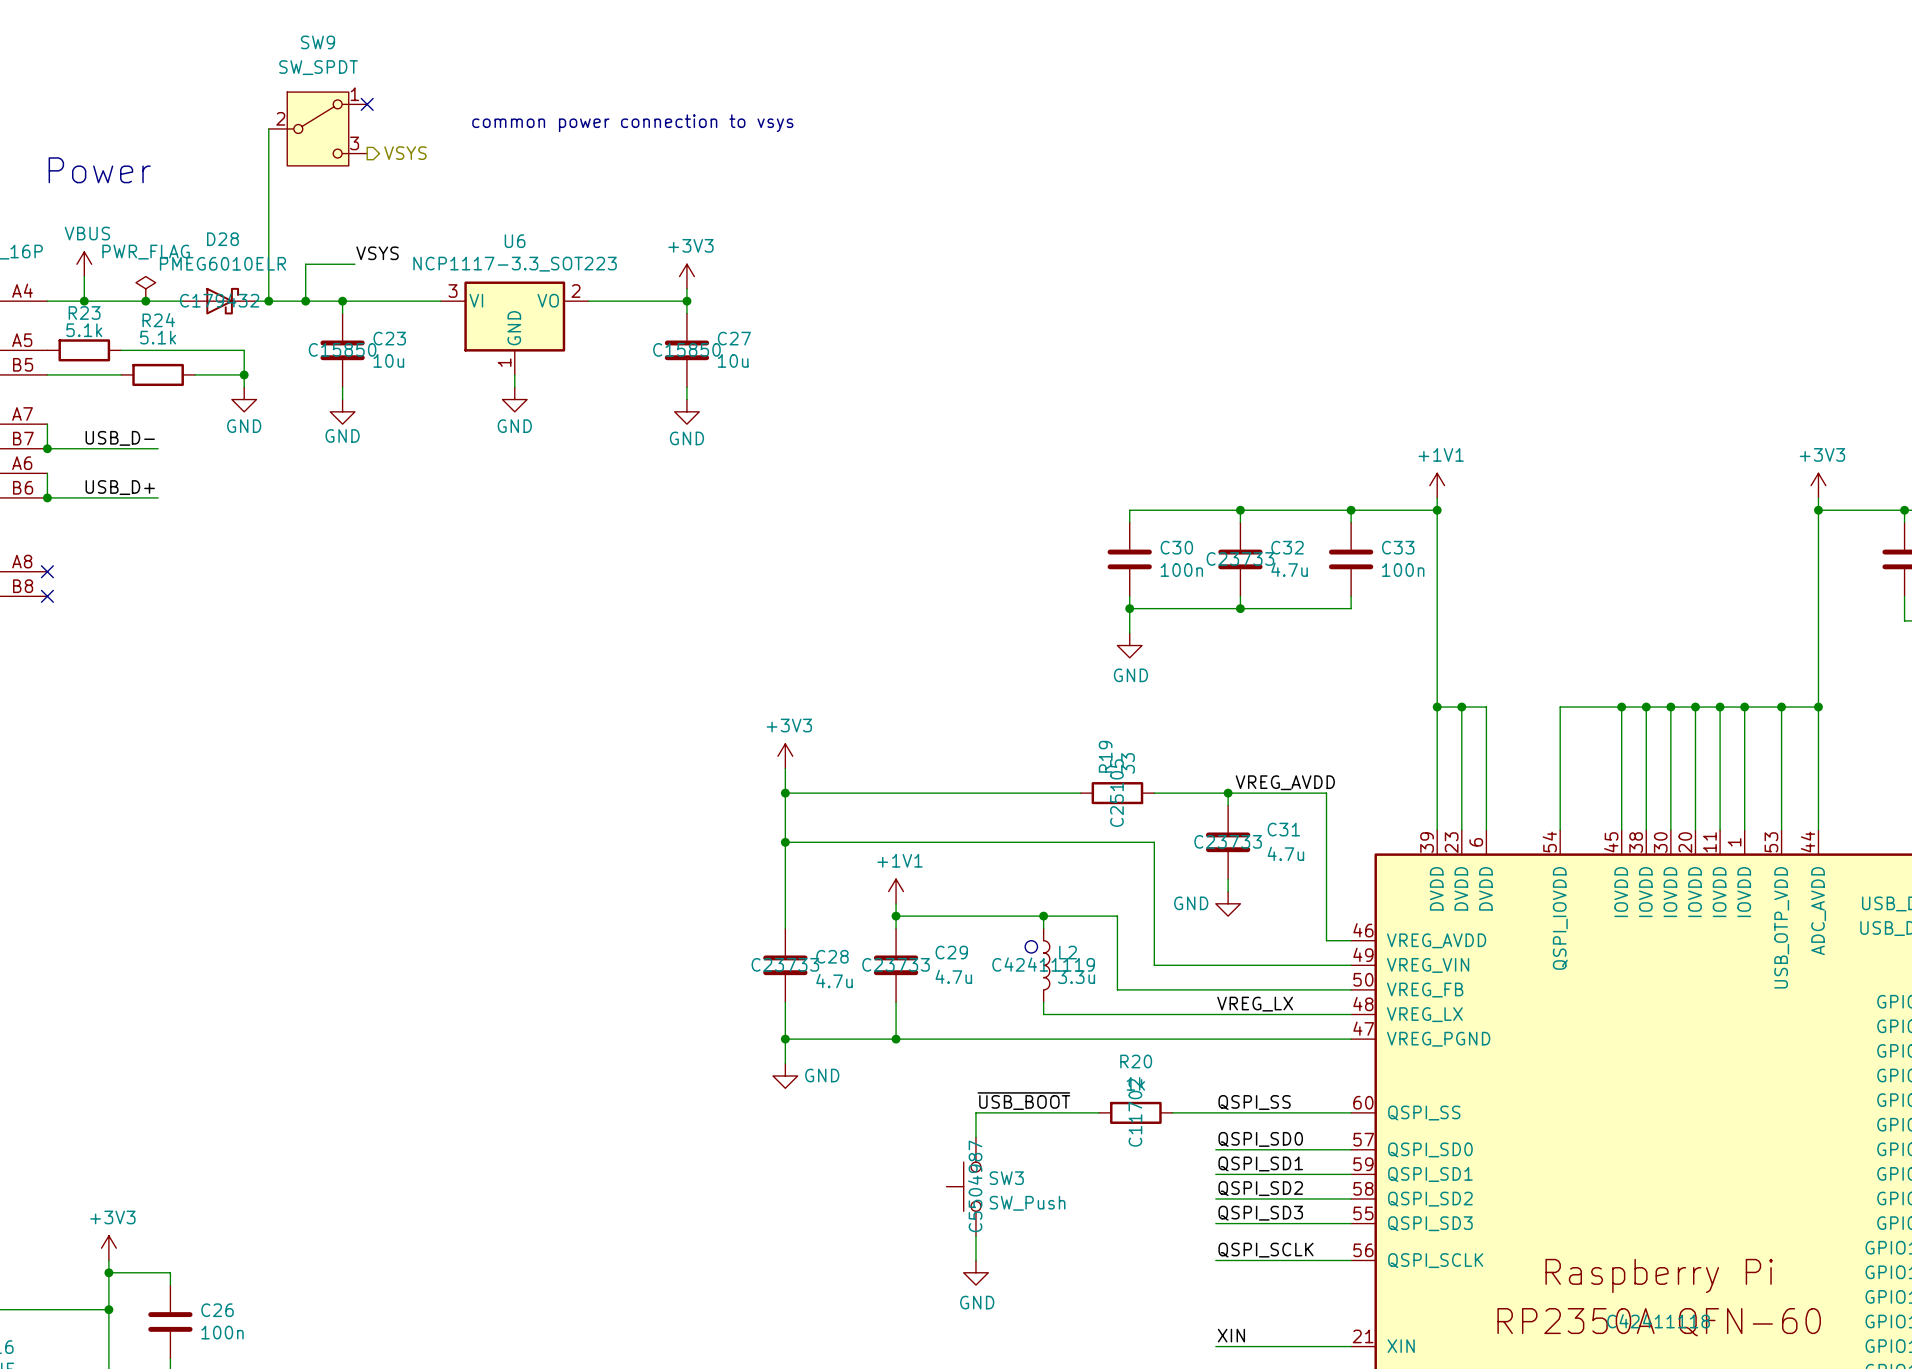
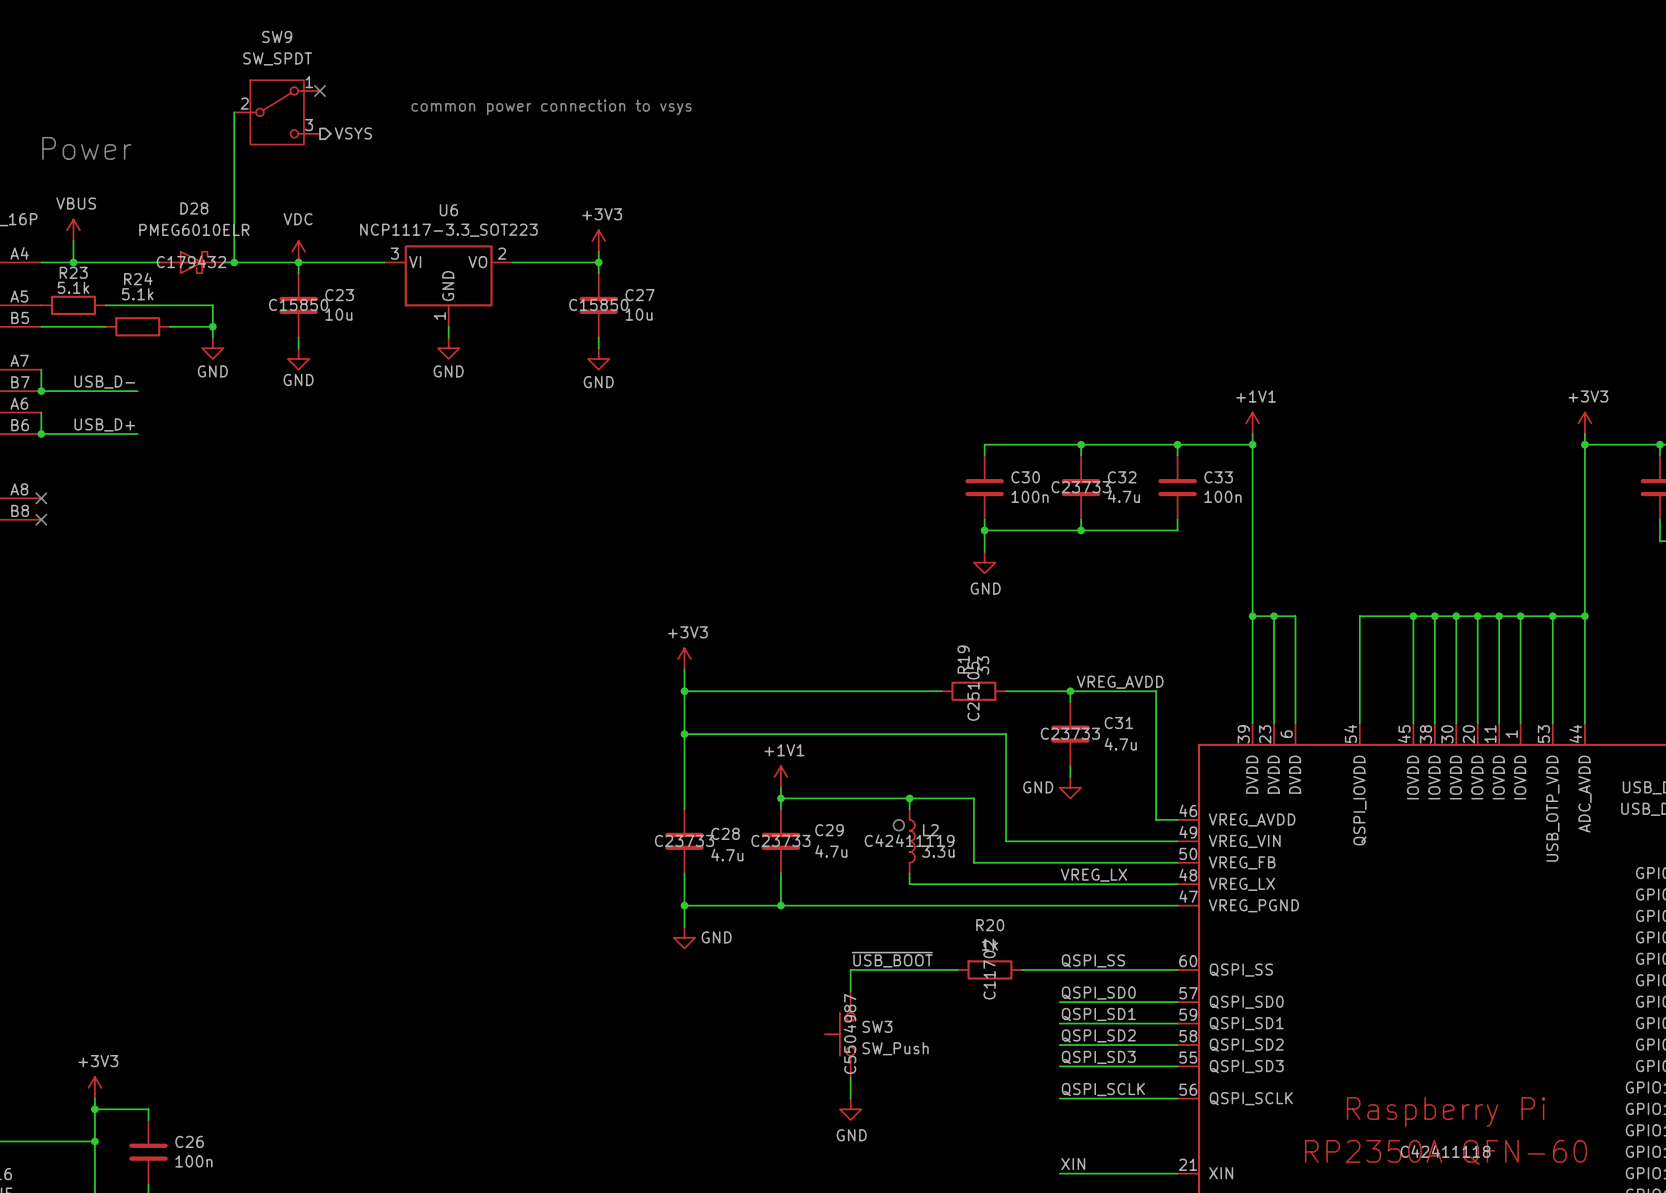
label: VSYS (377, 253) -> none
wire: (354, 264) (305, 264) (305, 301) -> none
power symbol: PWR_FLAG (145, 288) -> none
power symbol: none -> VDC (298, 251)
junction: (145, 301) -> none
junction: (305, 301) -> none

